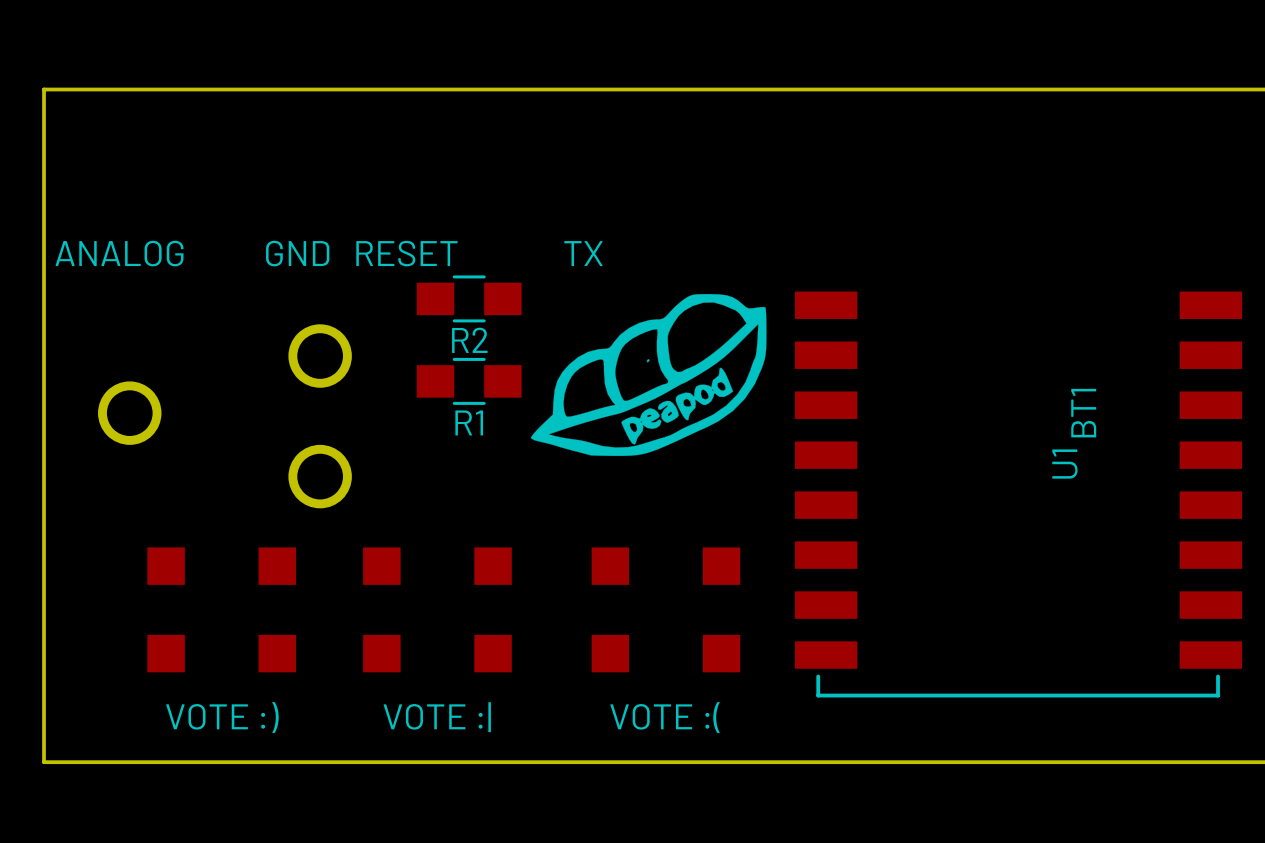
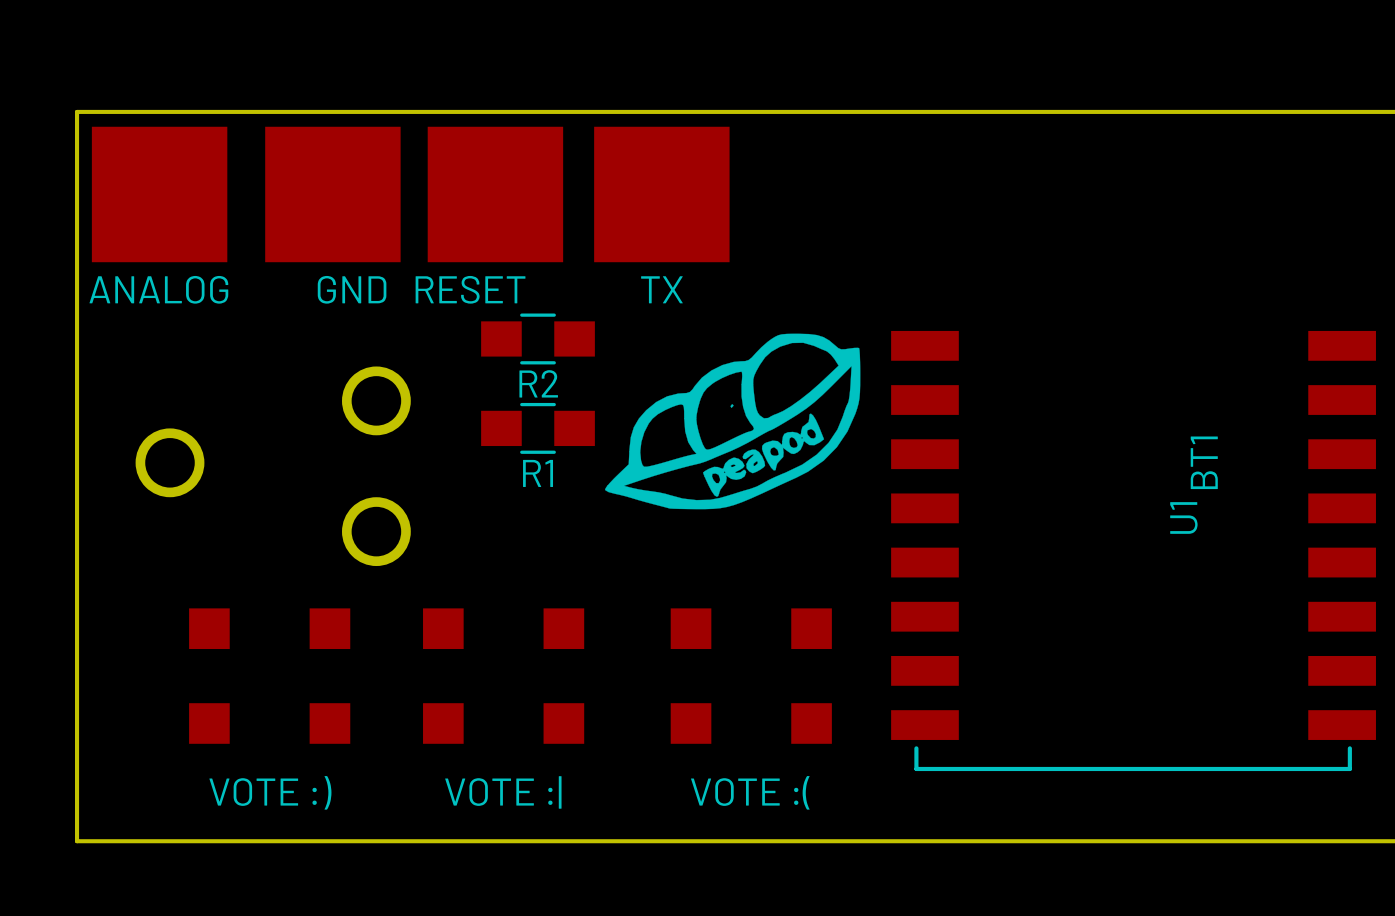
ANALOG: none -> (159, 194)
GND RESET: none -> (414, 194)
TX: none -> (661, 194)

